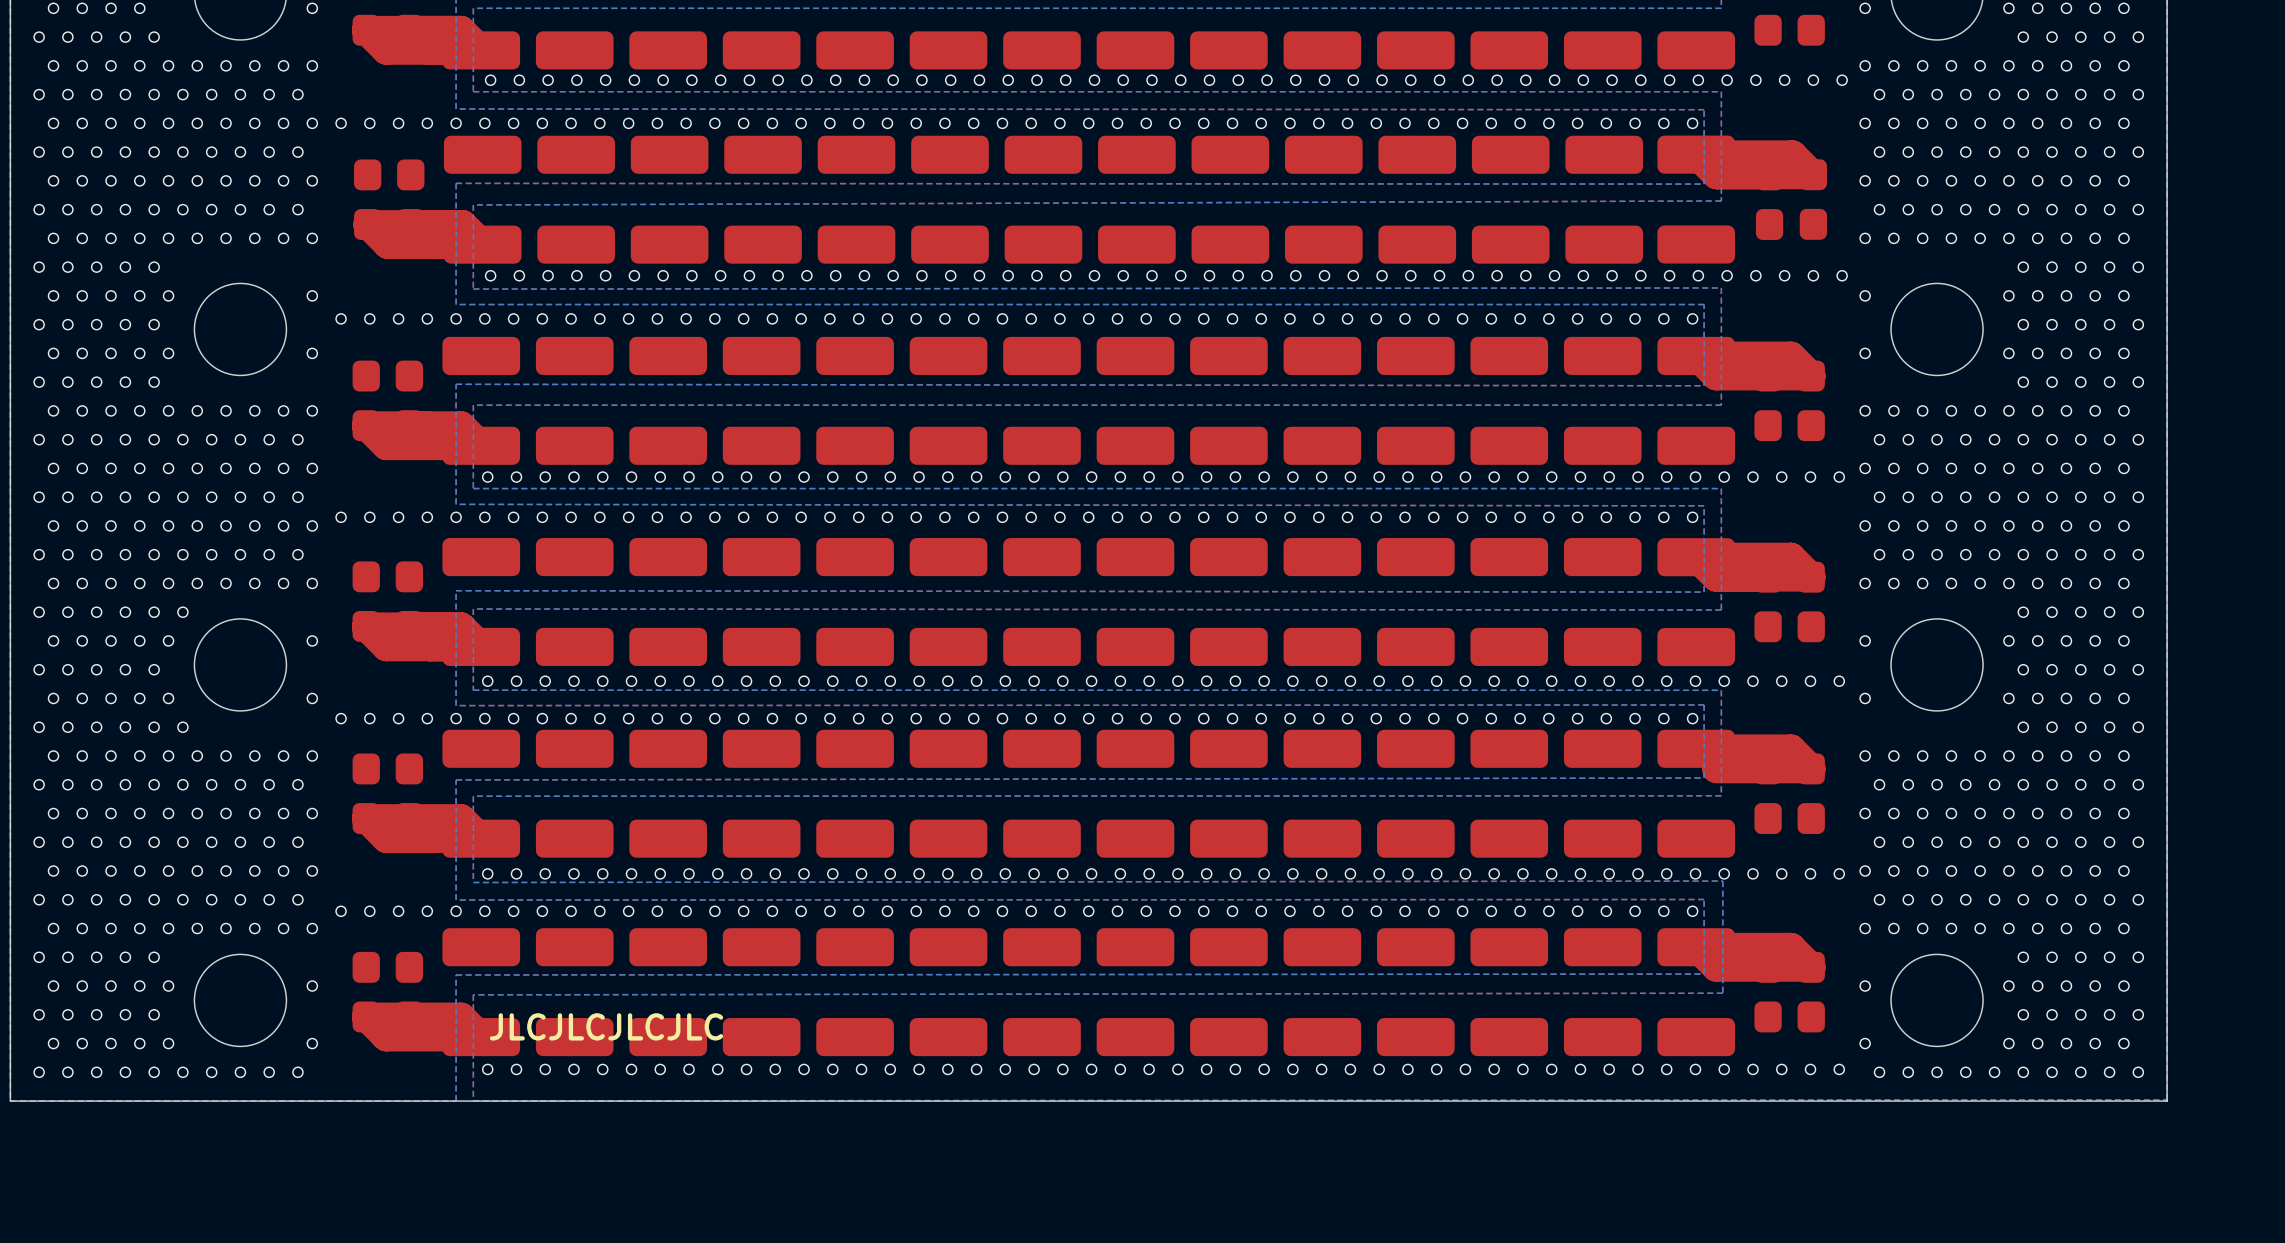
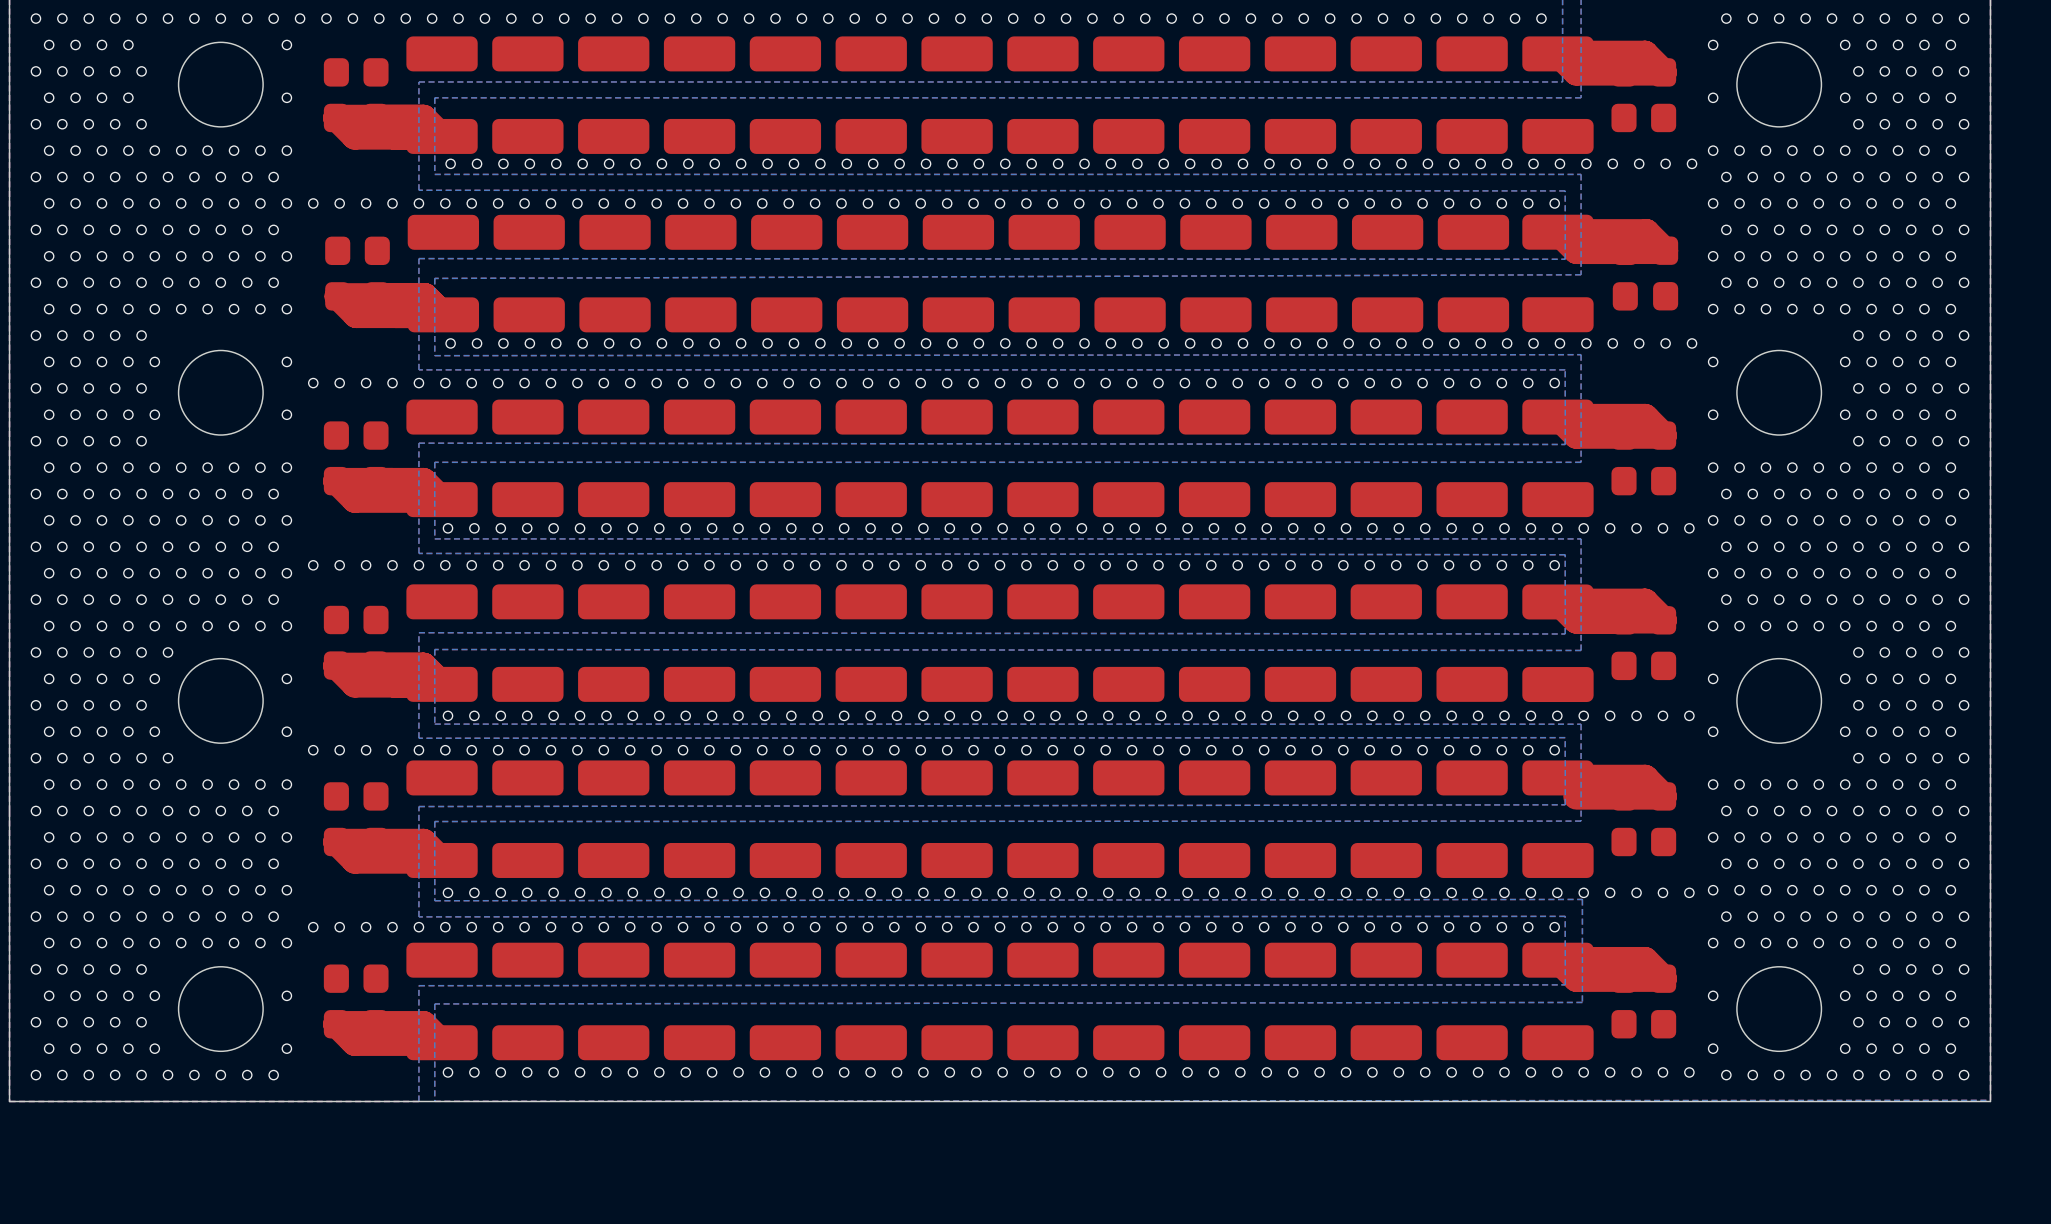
text: JLCJLCJLCJLC (606, 1026) -> none

